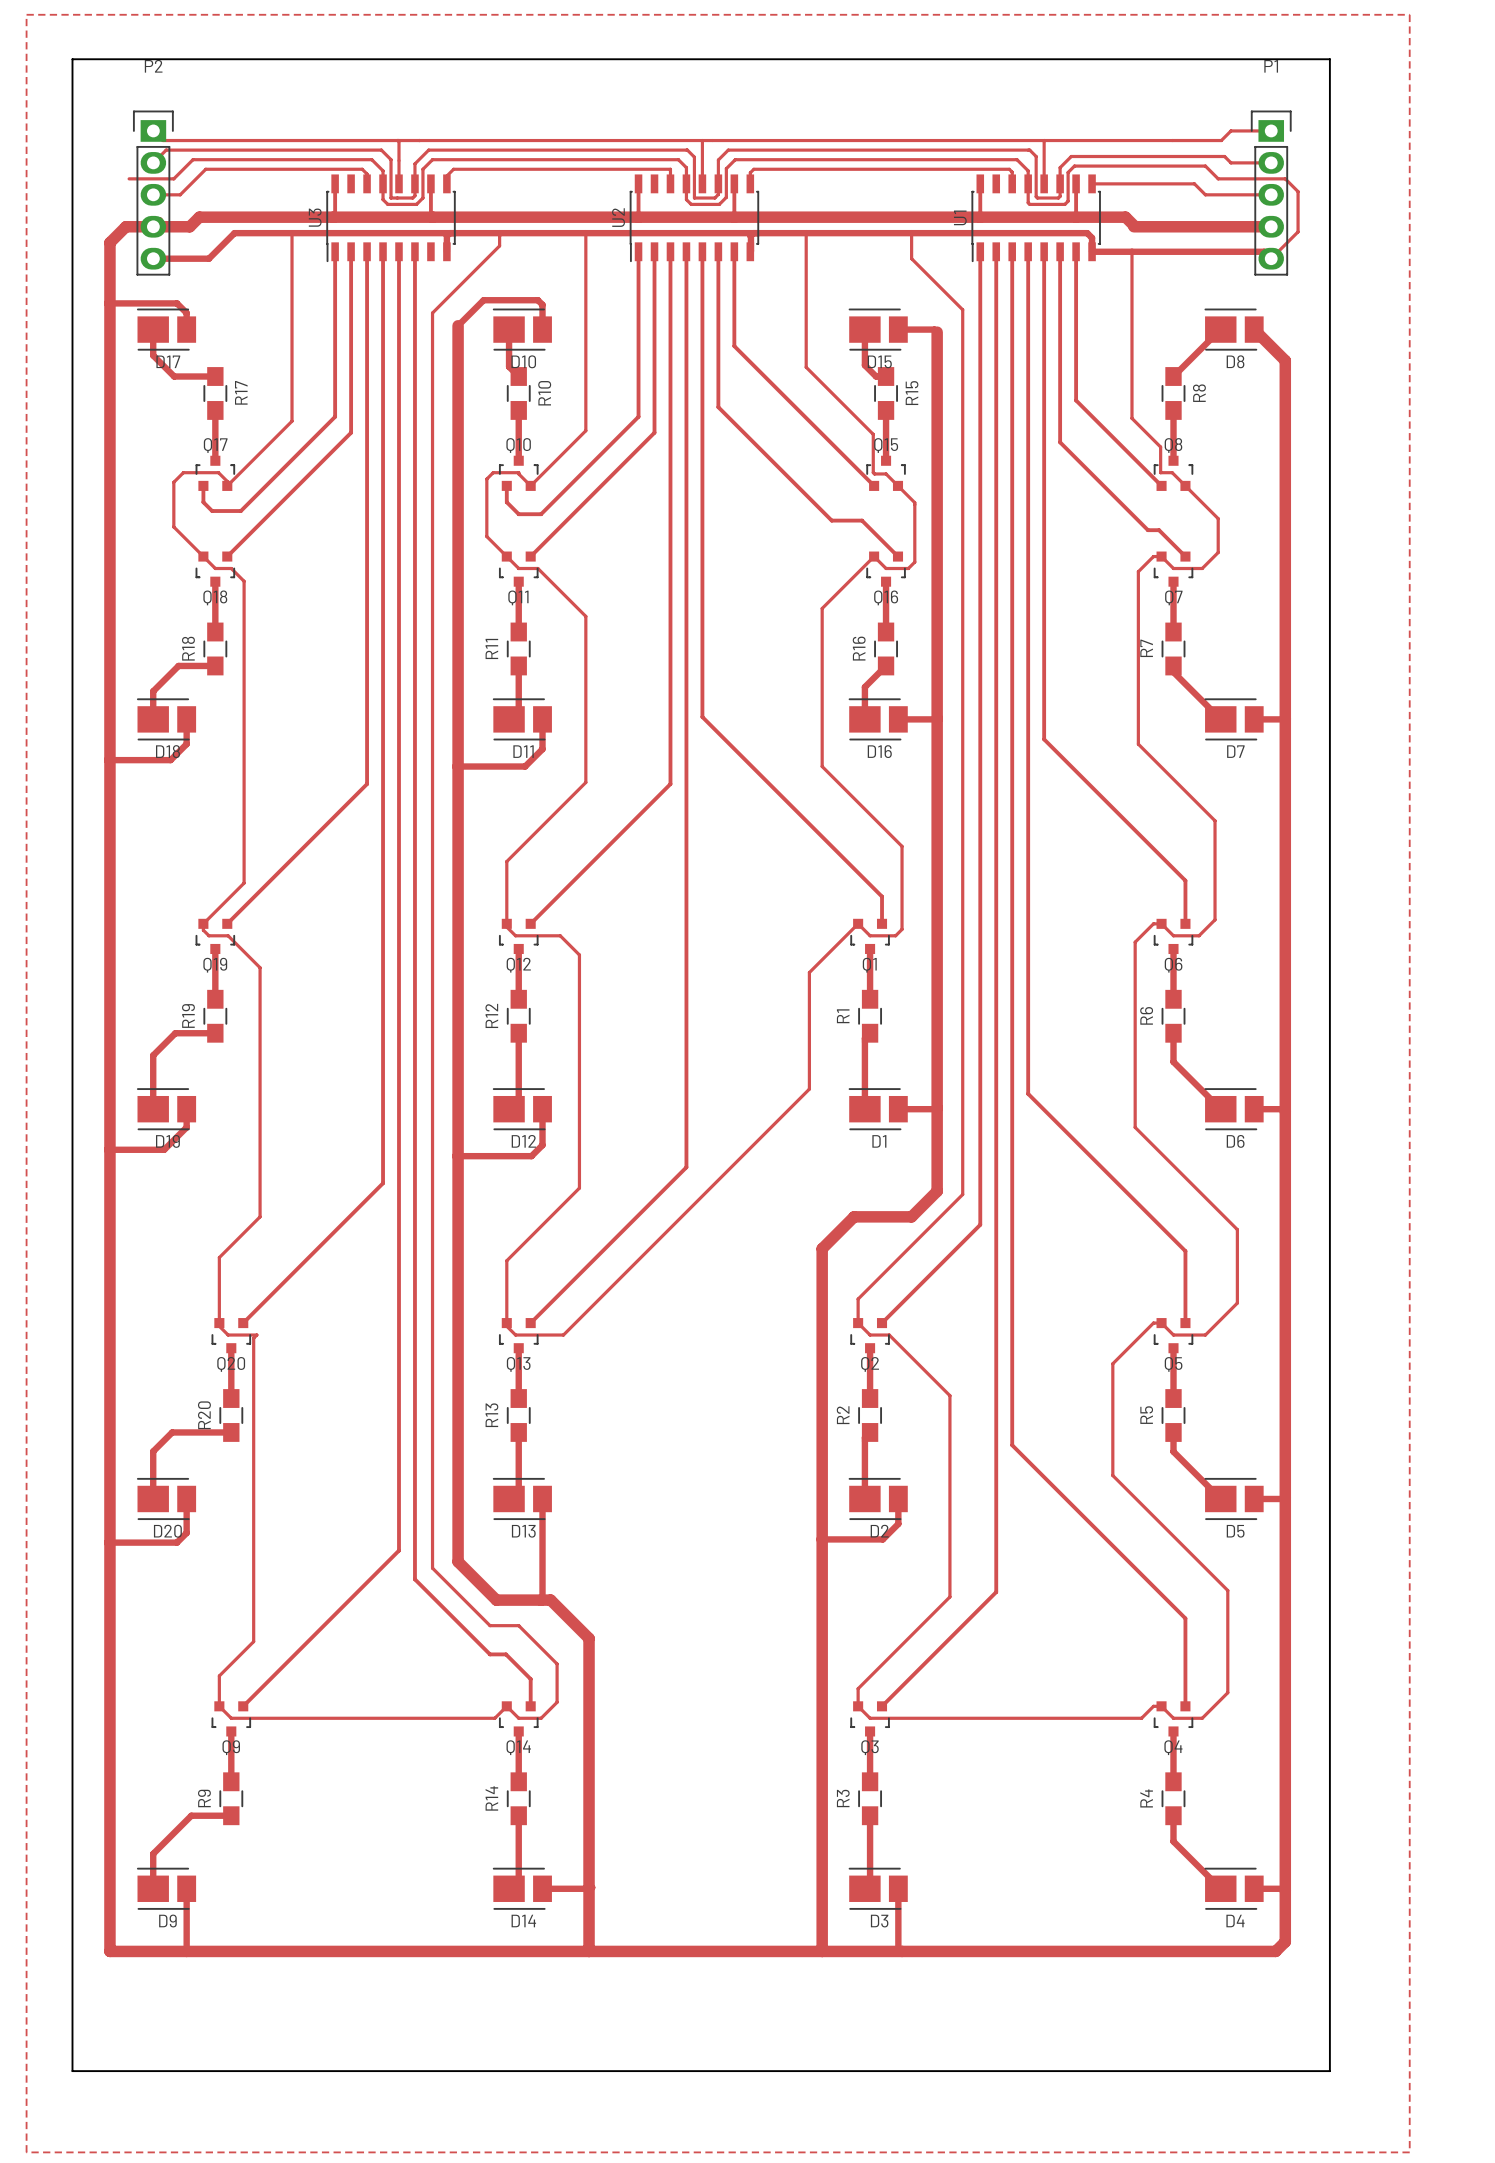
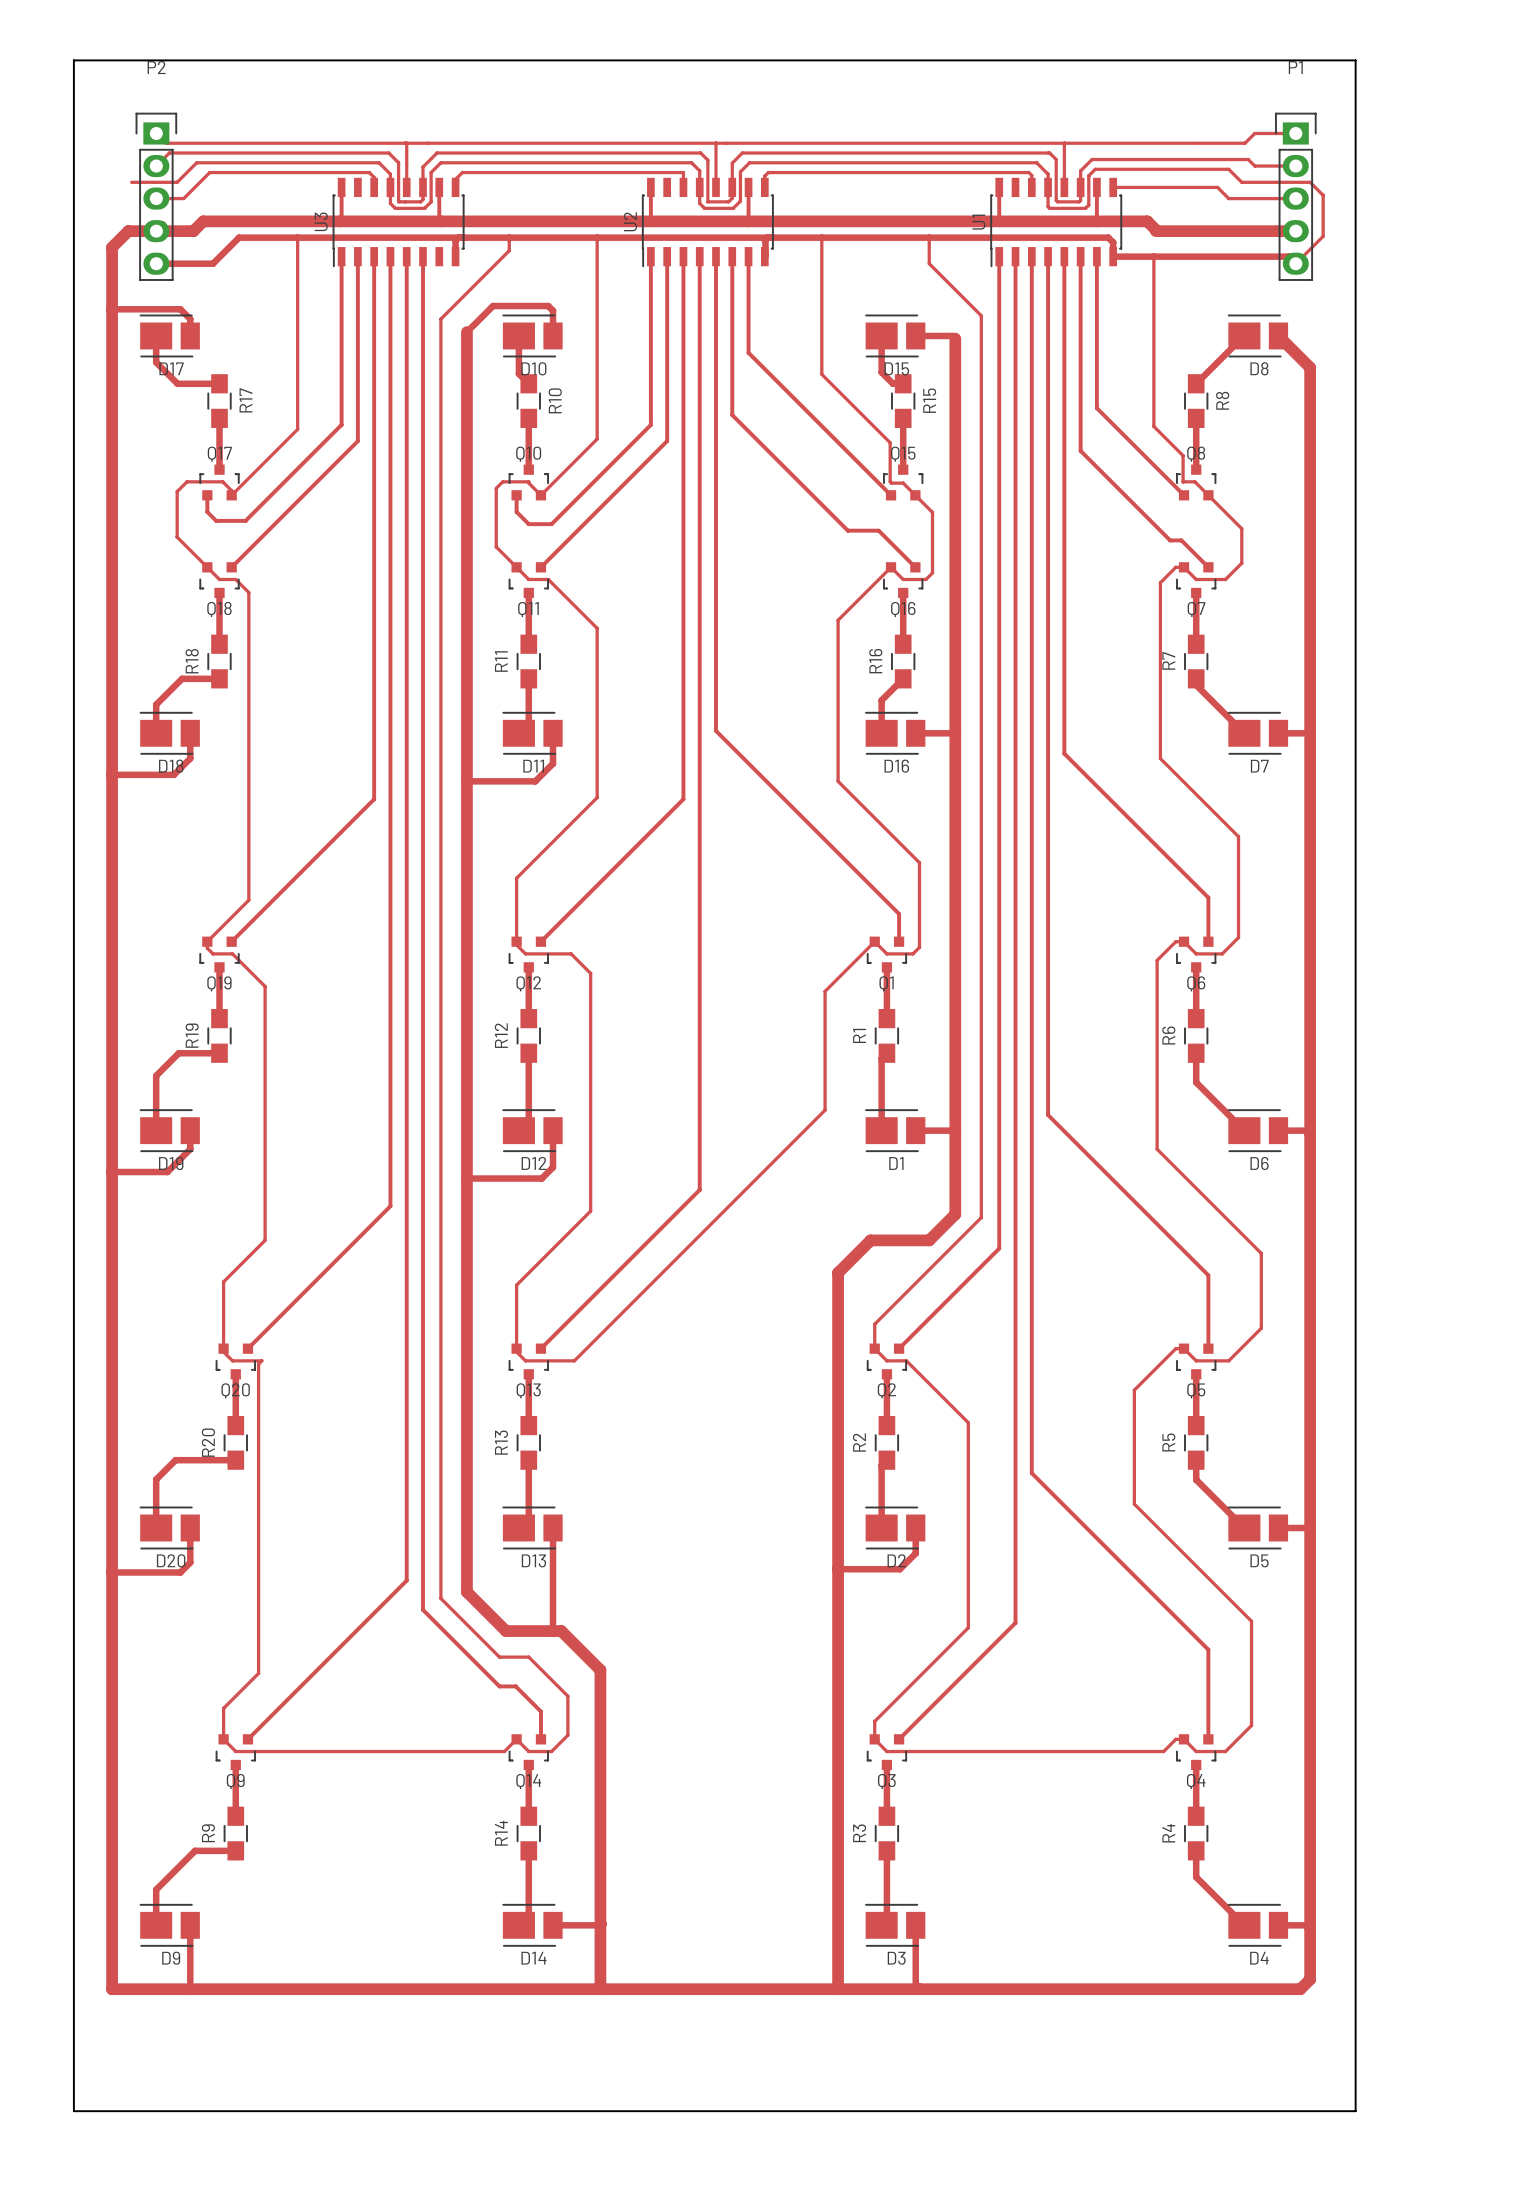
top zone outline: (26, 14) (26, 2152) (1409, 2152) (1409, 14) (26, 14) -> none

